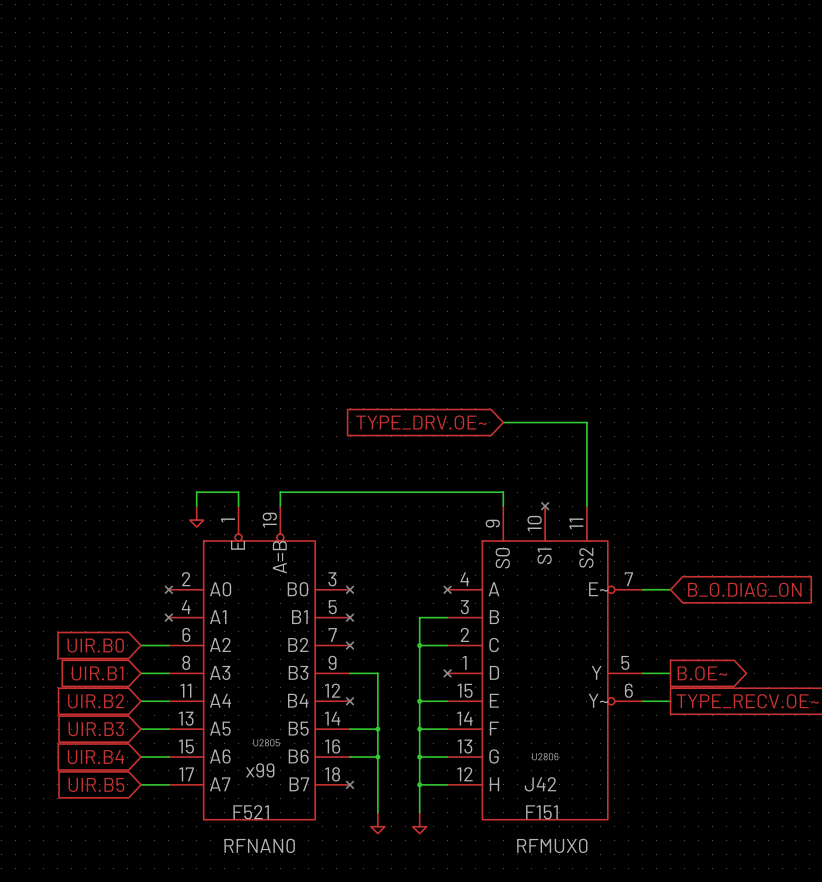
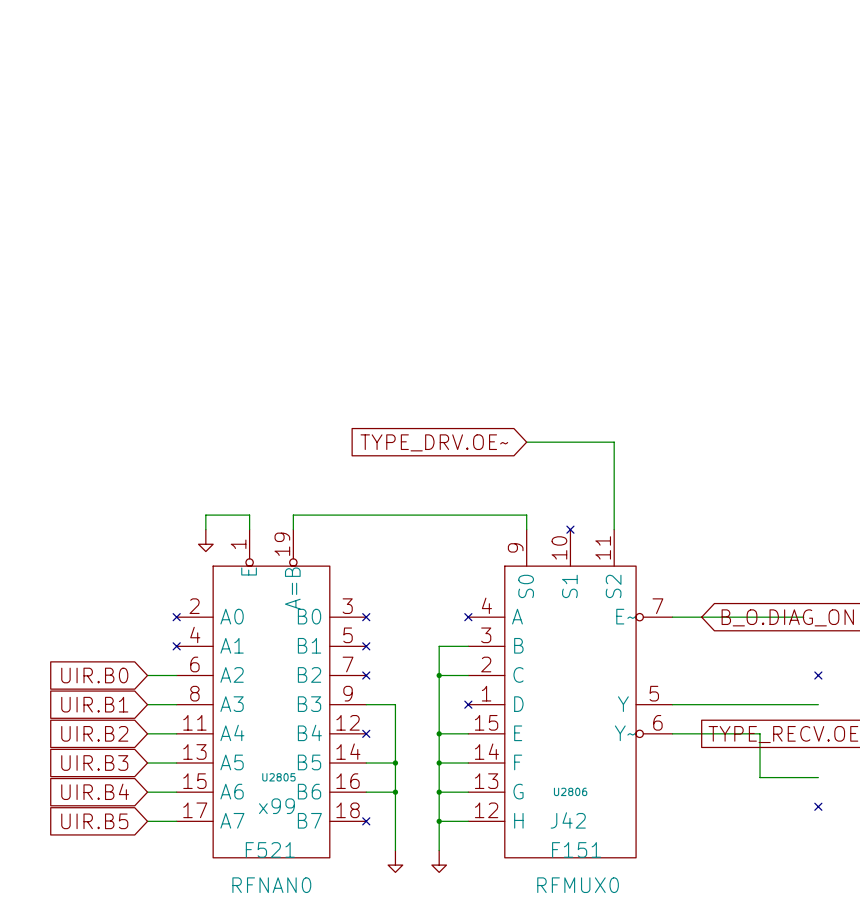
wire: none -> (701, 617) (803, 617)
no-connect mark: none -> (818, 675)
wire: none -> (701, 704) (818, 704)
global label: B.OE~ (702, 673) -> none
wire: none -> (701, 733) (760, 733) (760, 777) (818, 777)
no-connect mark: none -> (818, 806)

